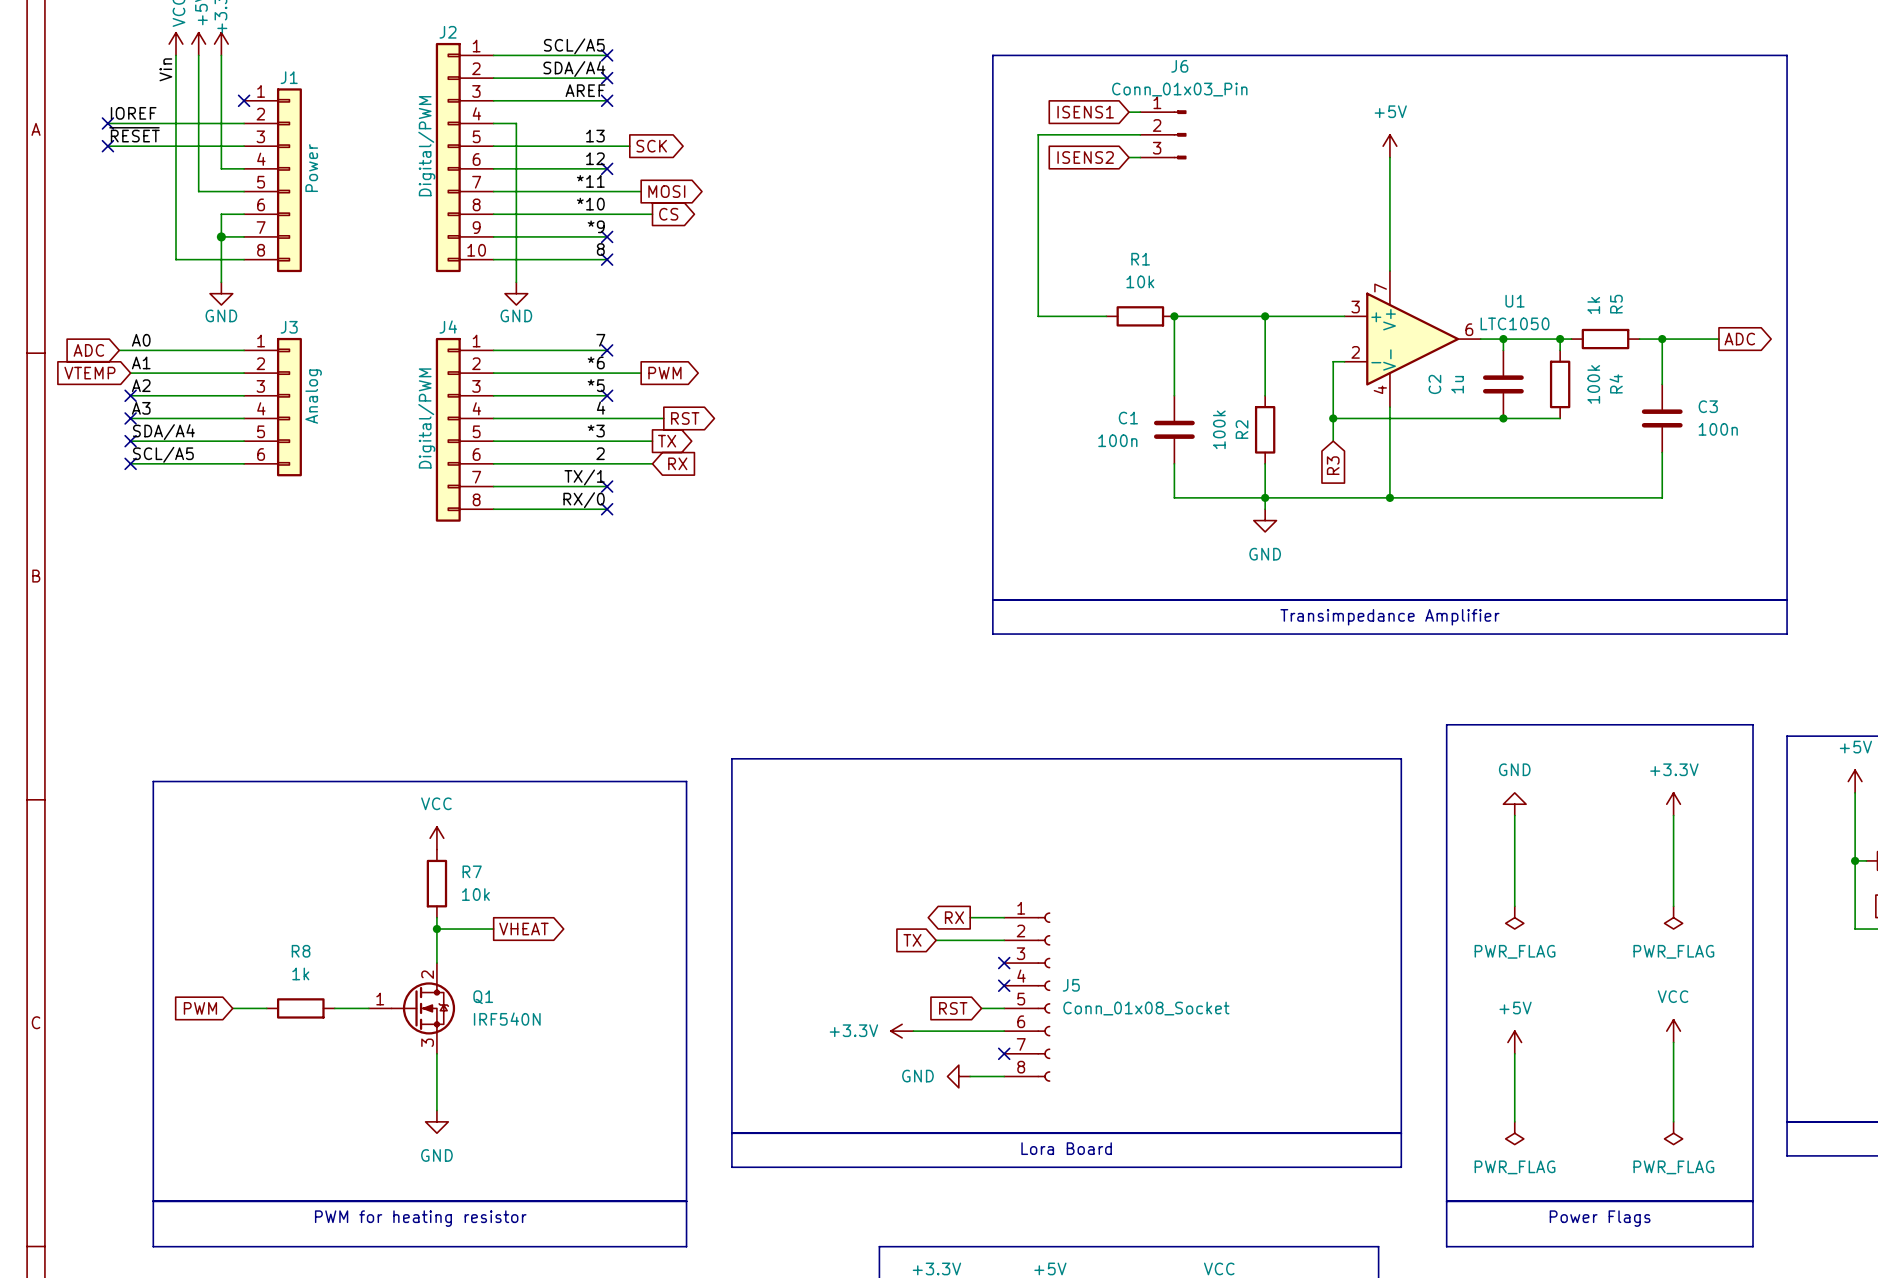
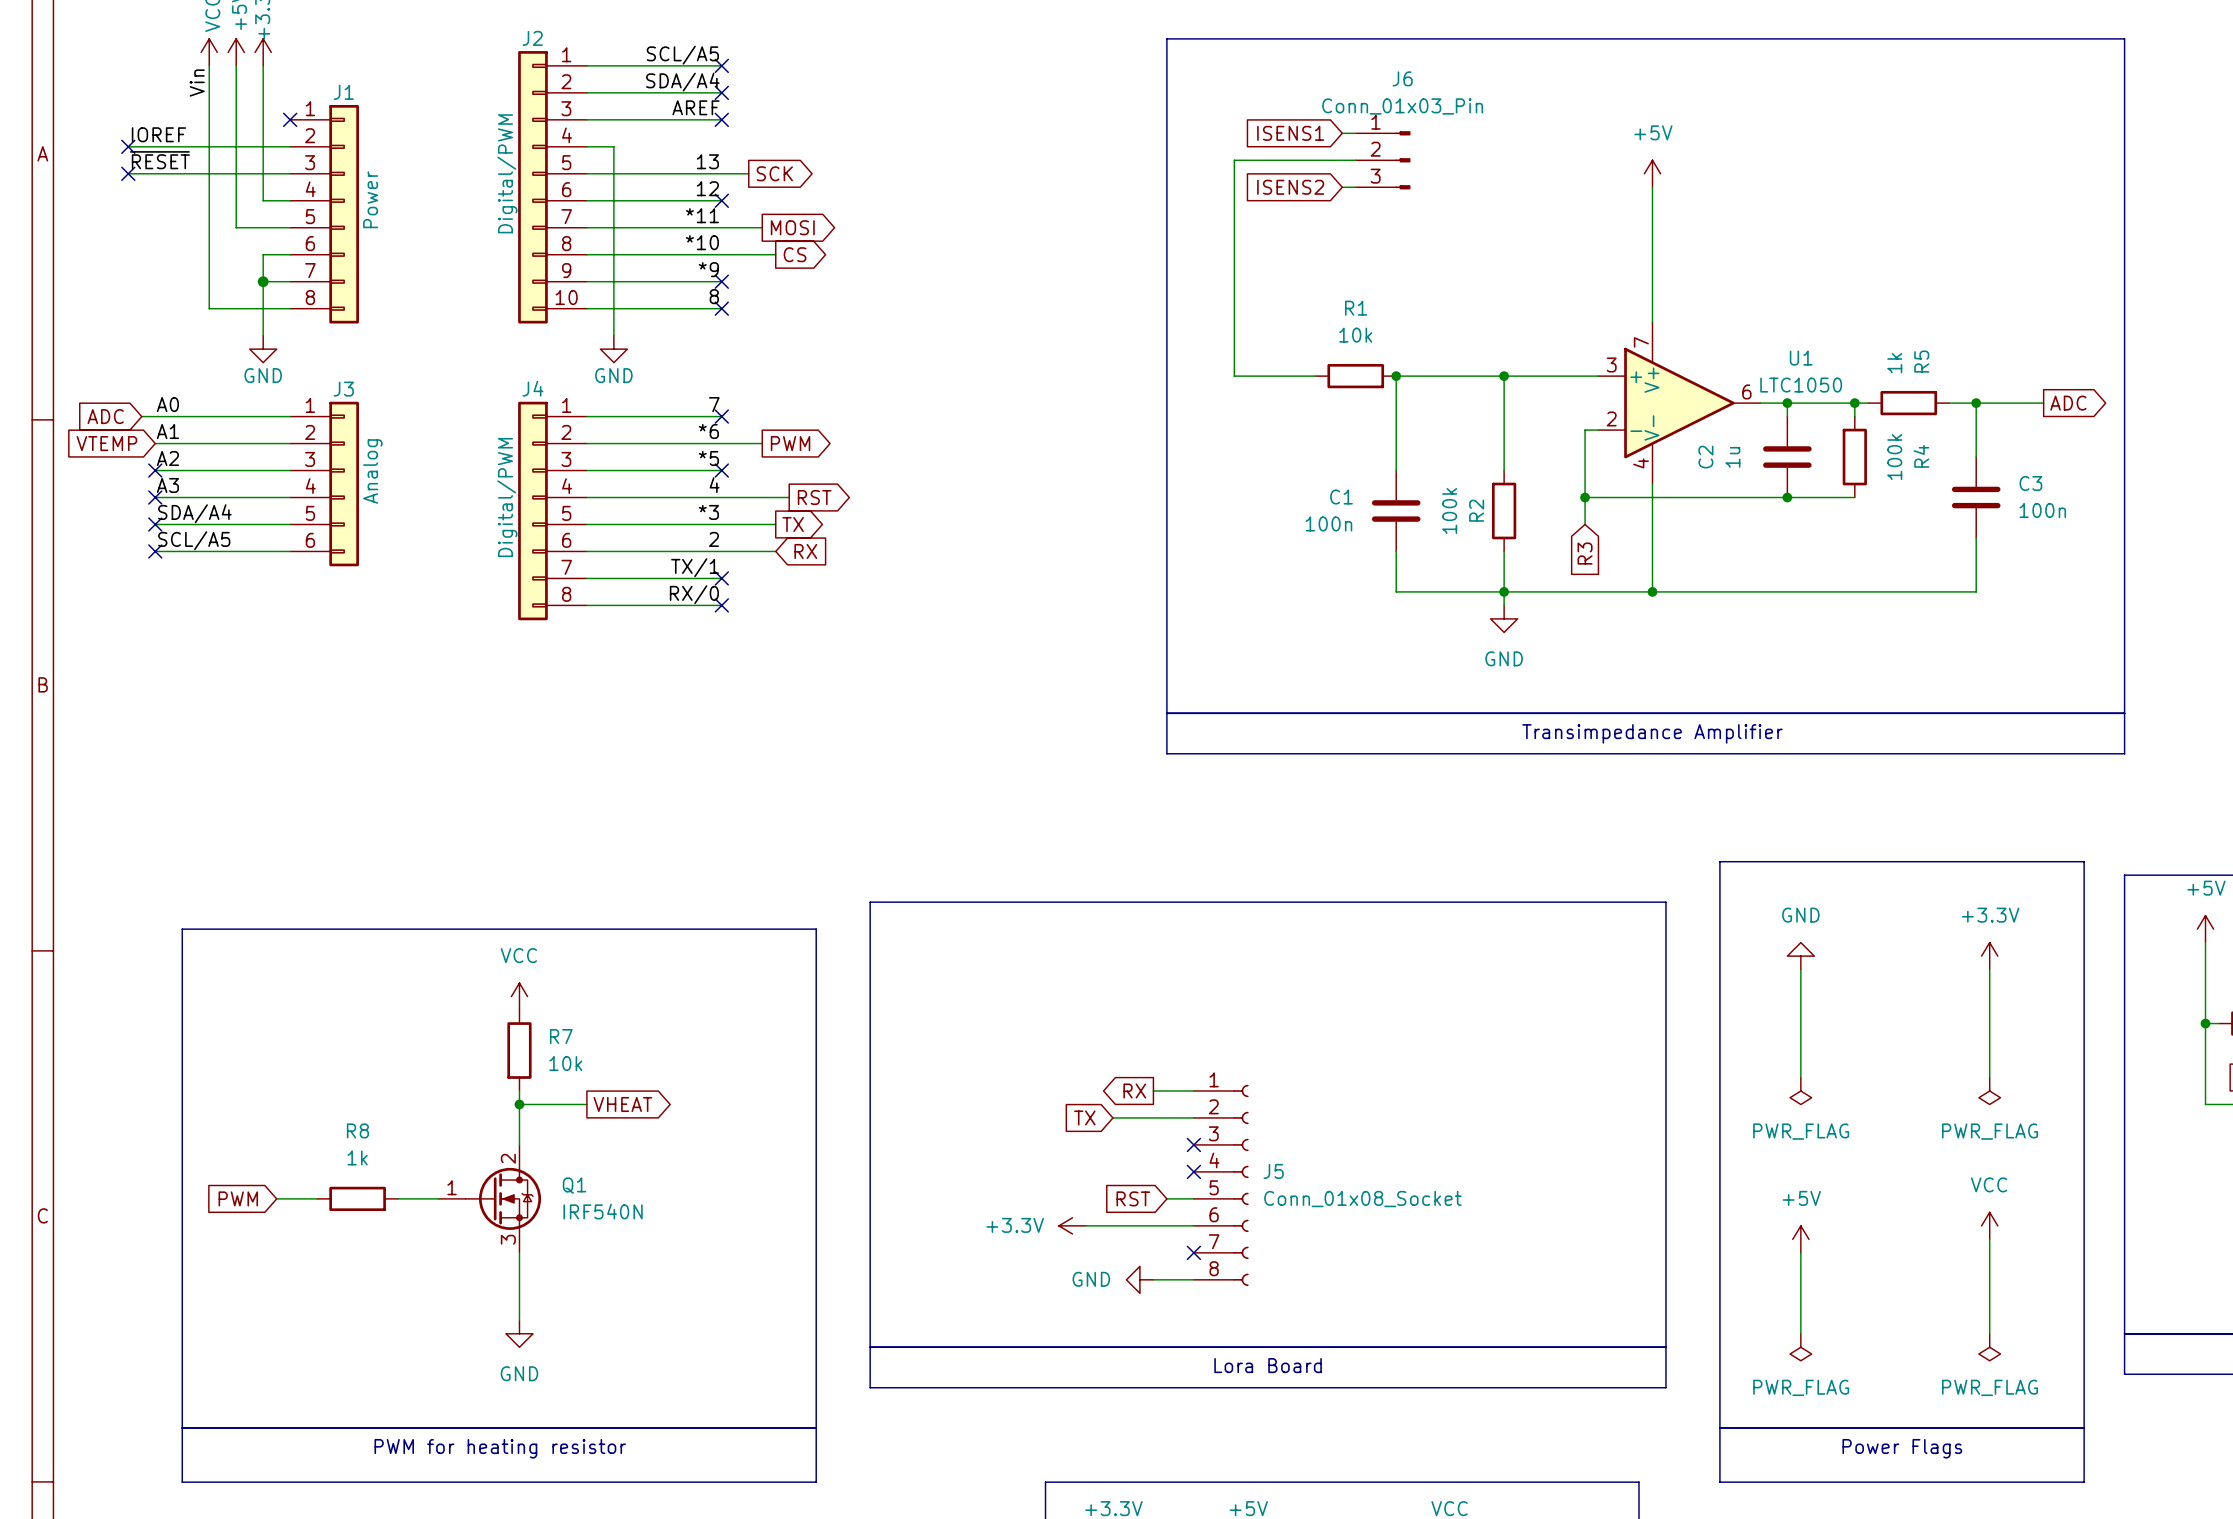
line: (1787, 55) (992, 55) (992, 634) -> (2124, 65) (2124, 38) (1166, 38) (1166, 753) (1180, 753)
line: none -> (1166, 713) (1180, 713)

